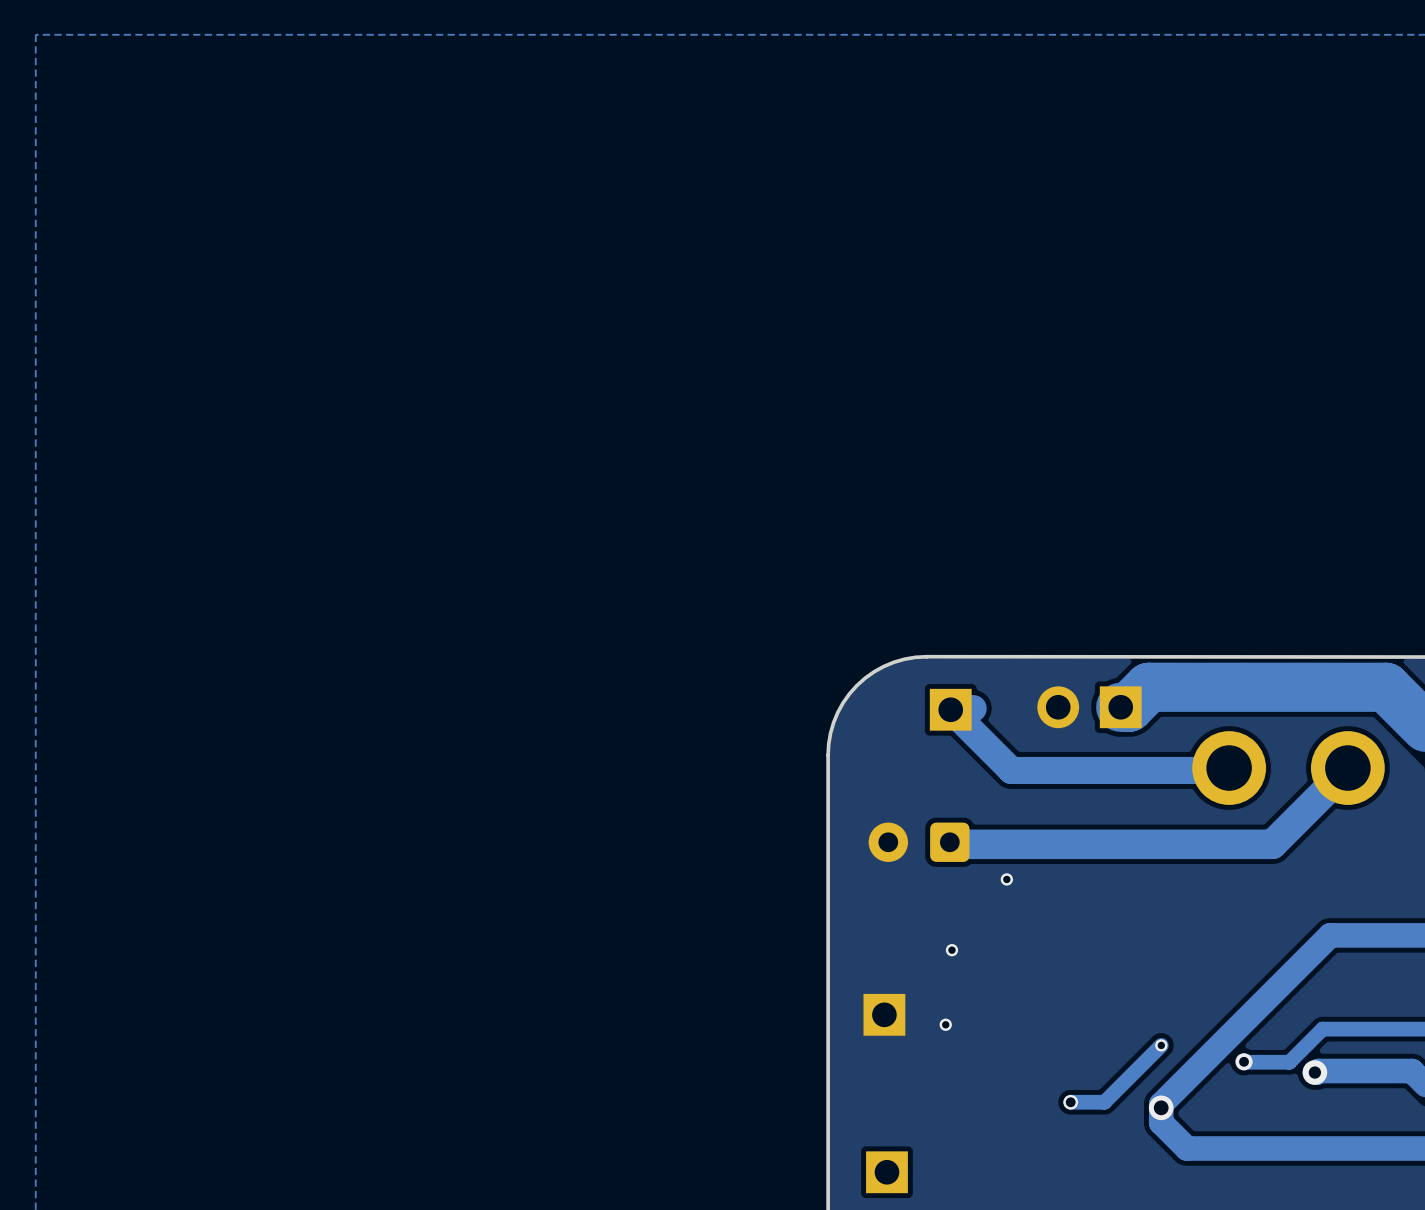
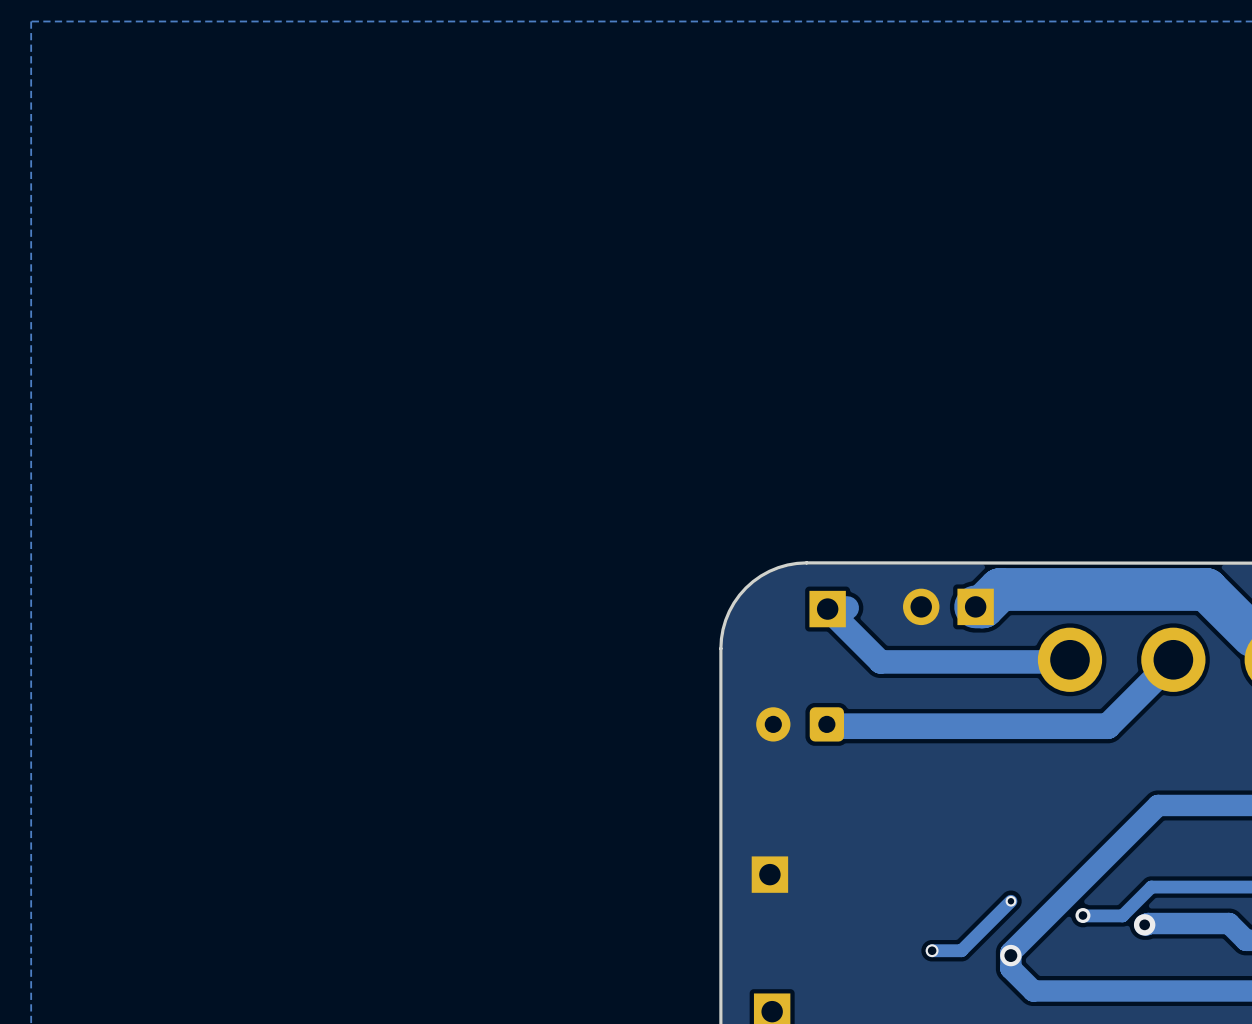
via: (1006, 879) -> none
via: (951, 950) -> none
via: (945, 1024) -> none

